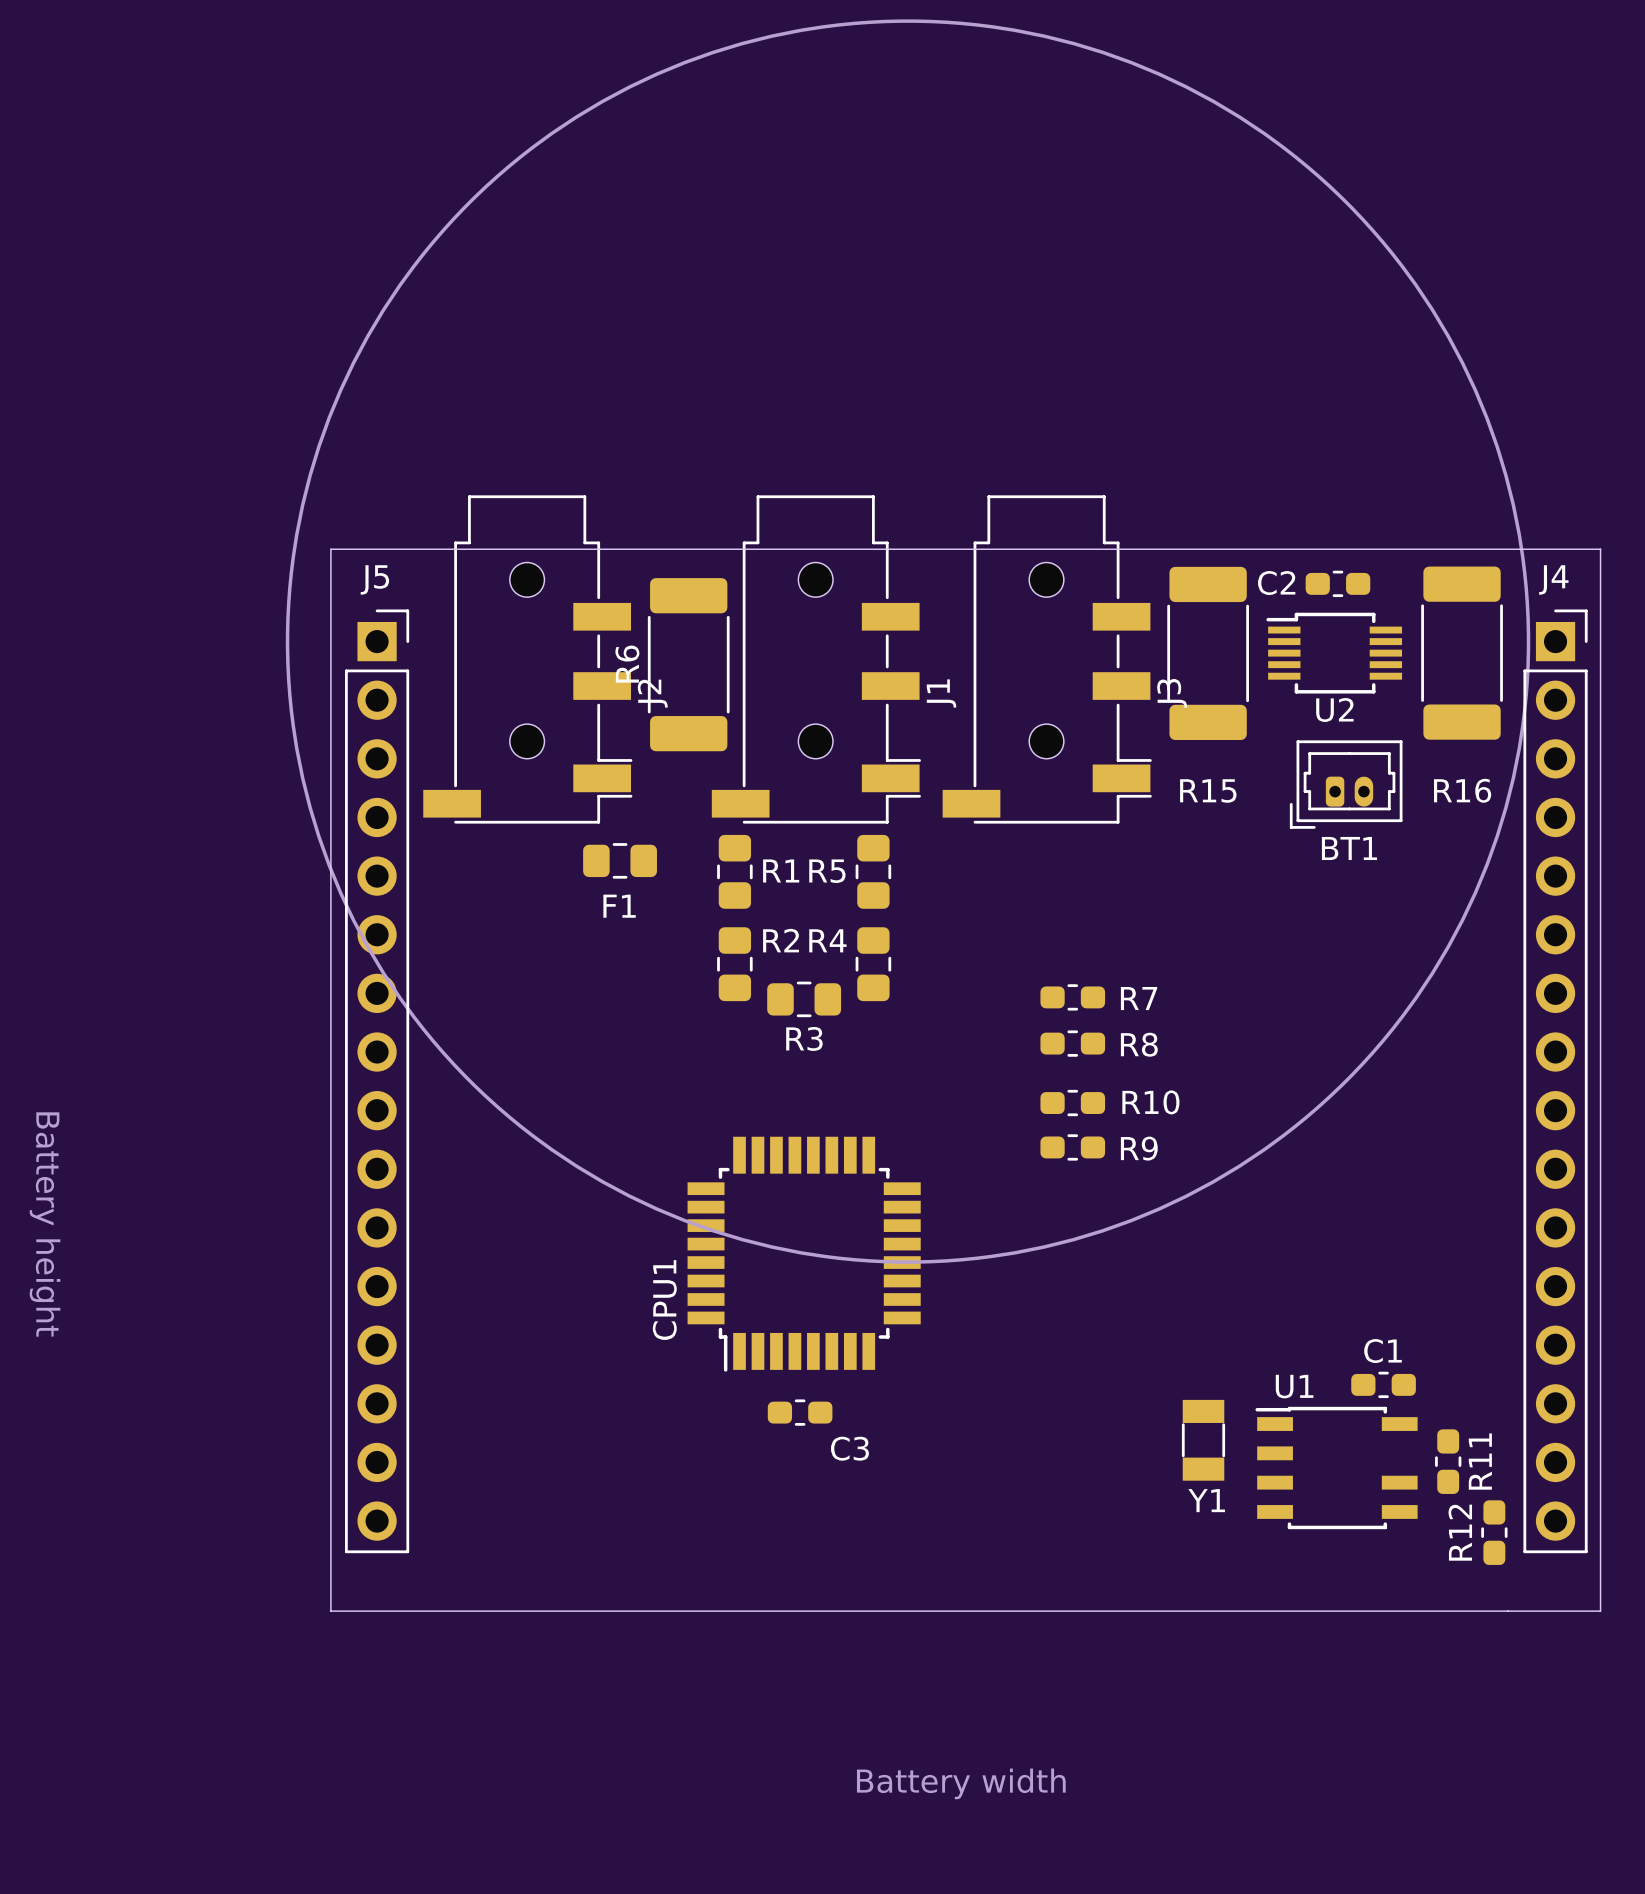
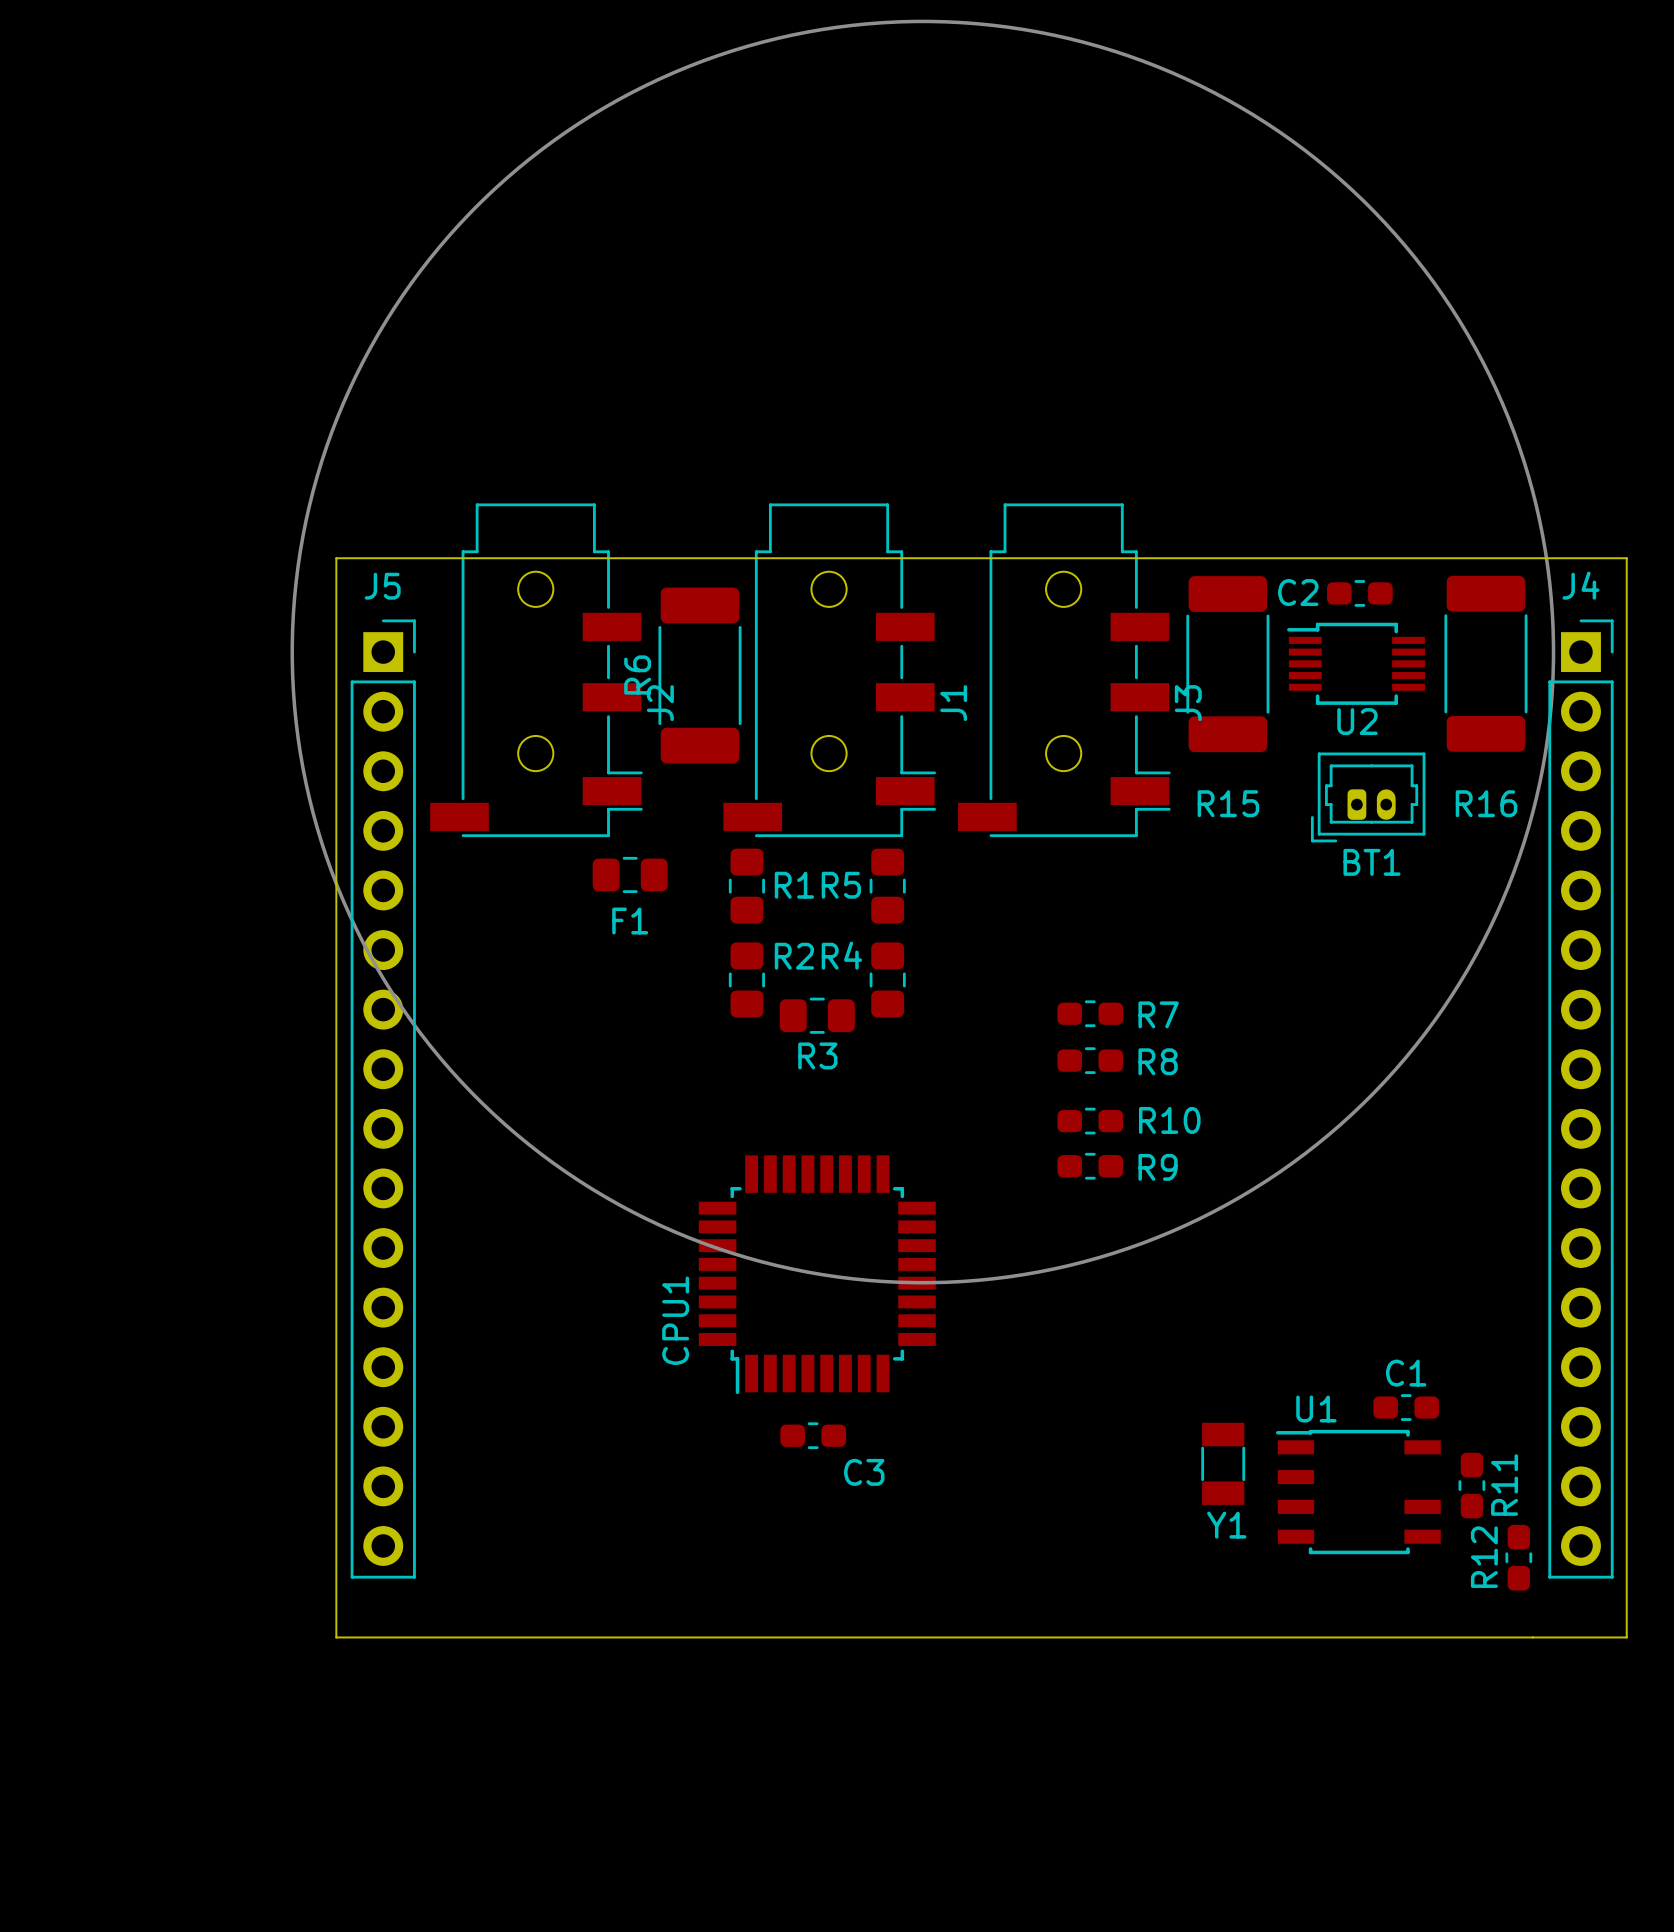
text: Battery height (45, 1224) -> none
text: Battery width (961, 1783) -> none

